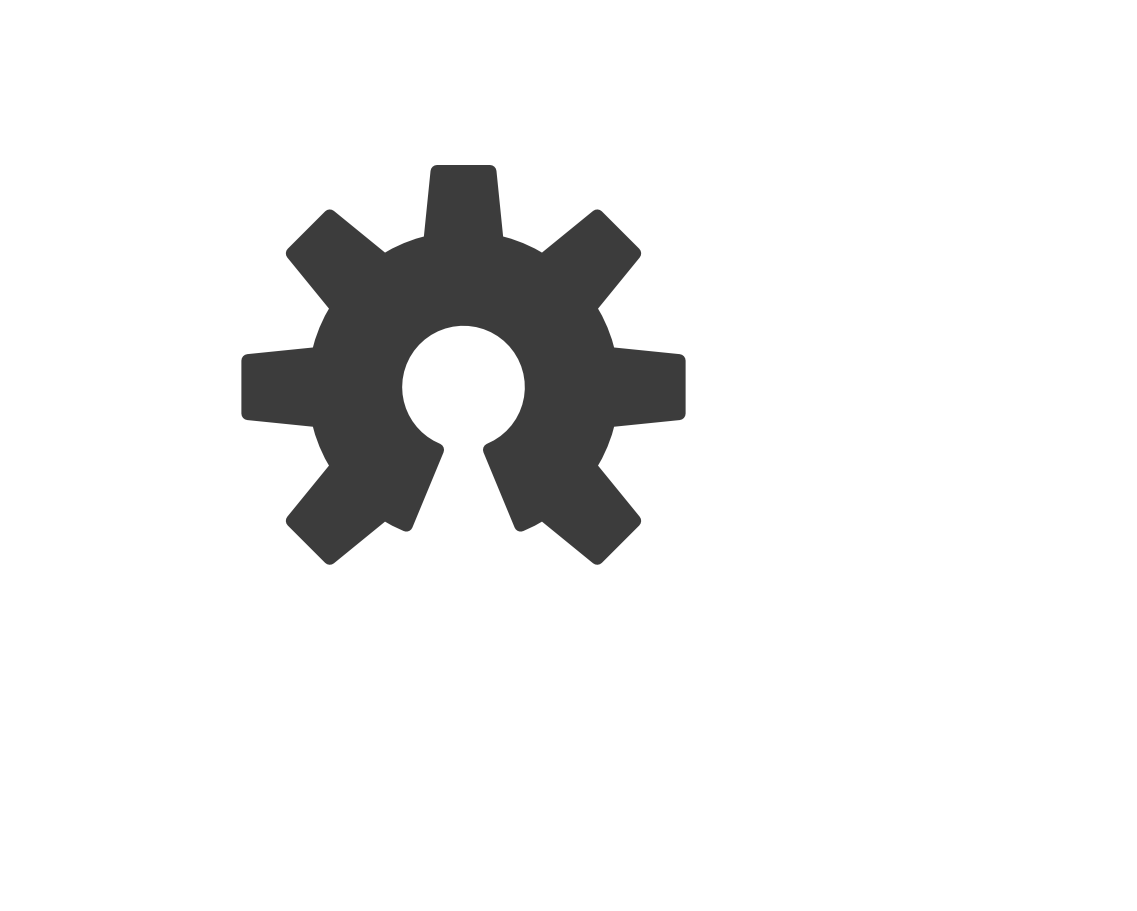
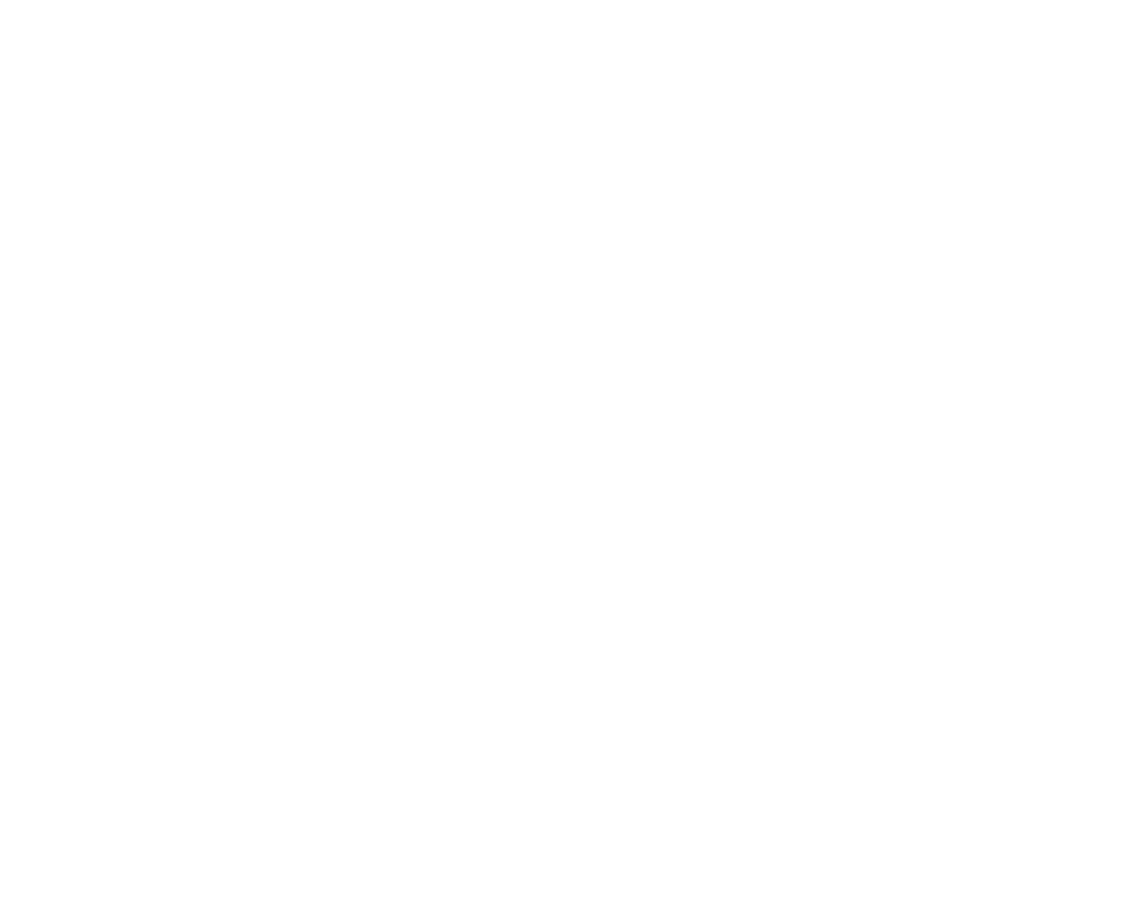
drawing: [241, 165, 686, 565] -> none

